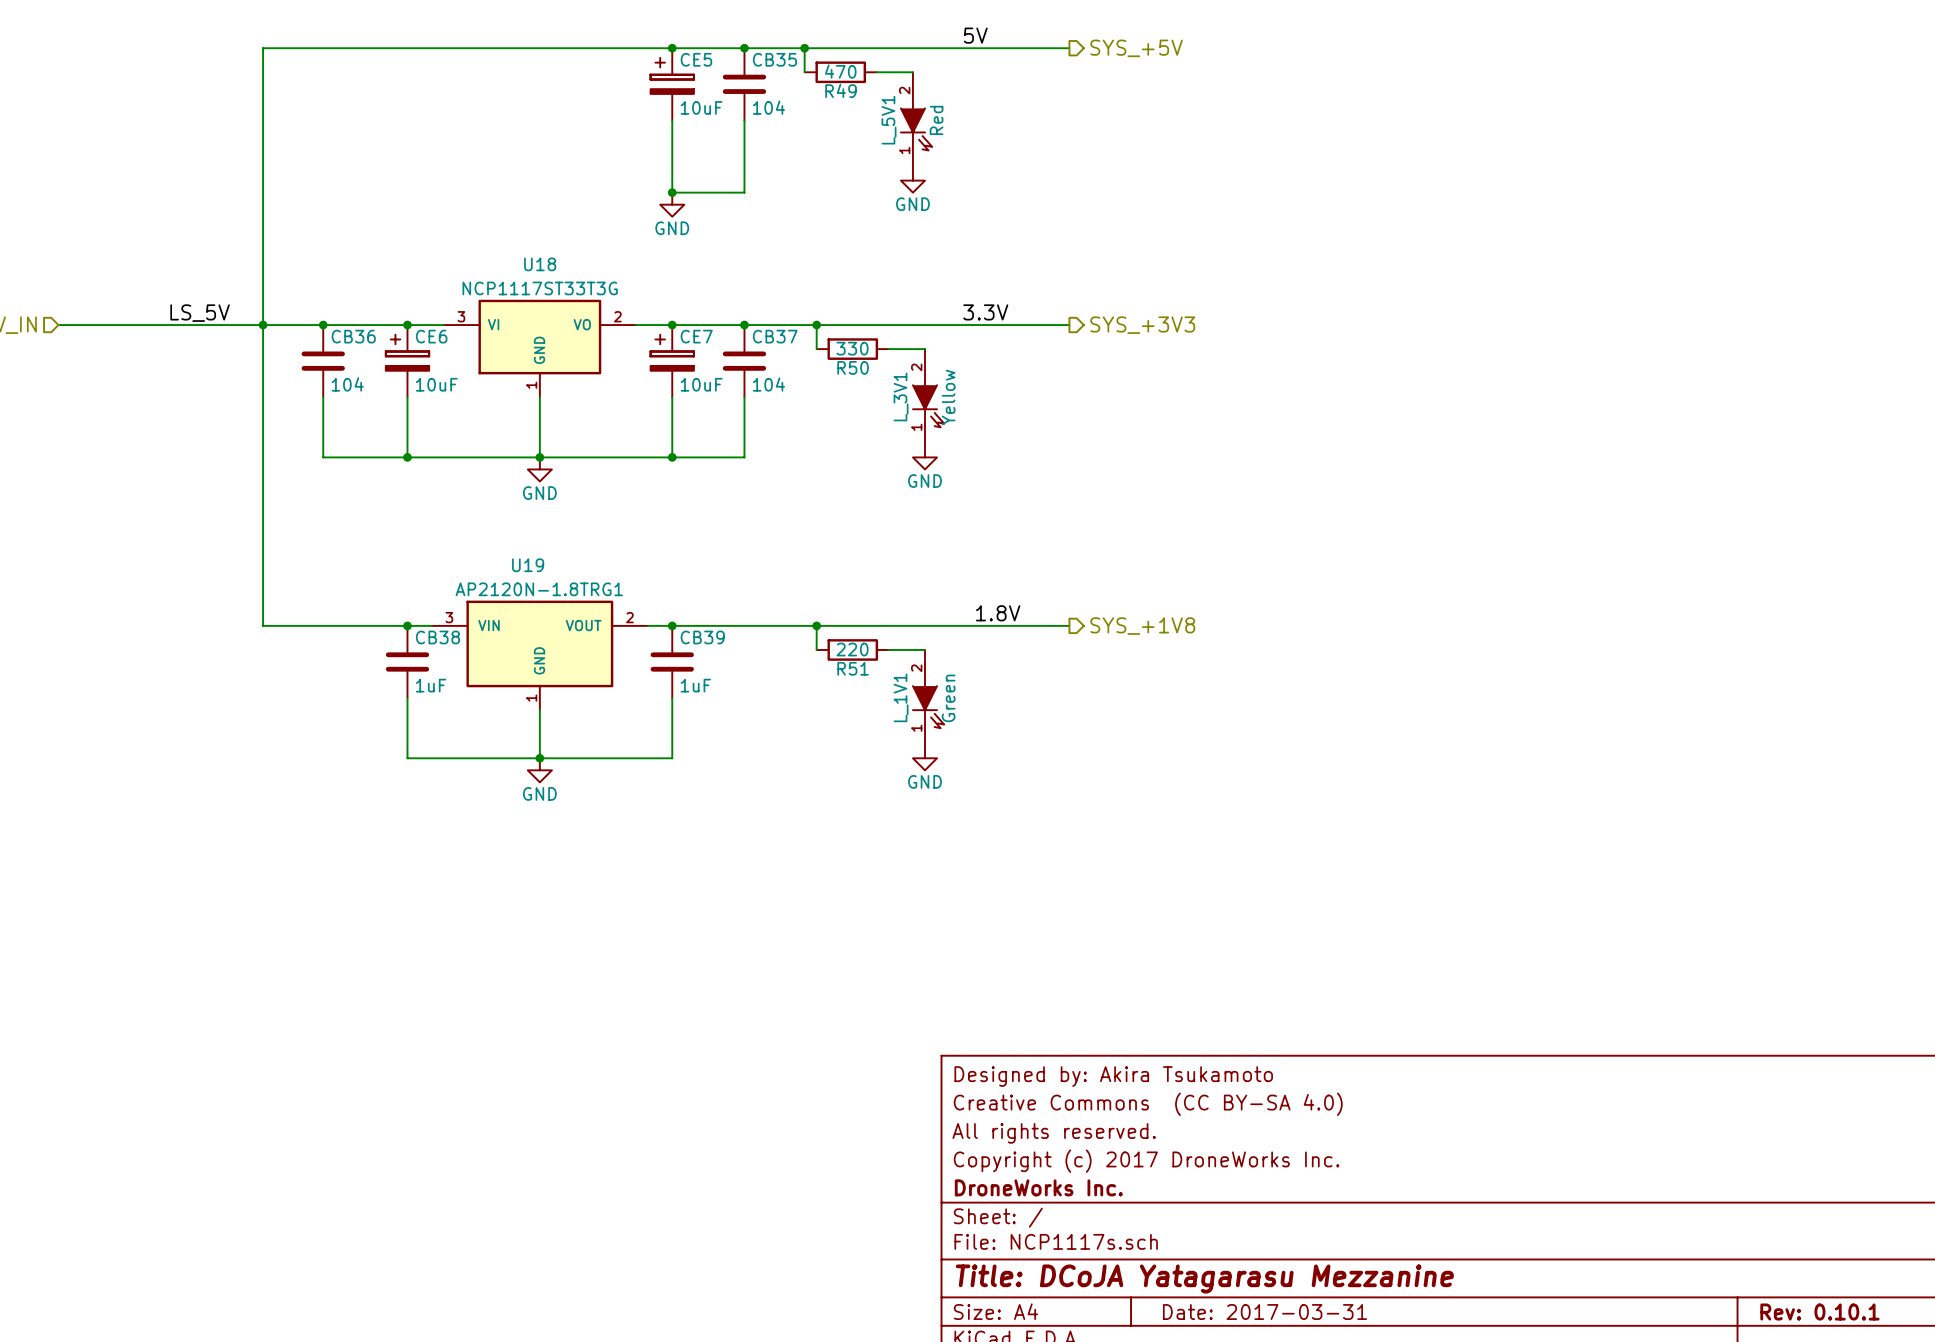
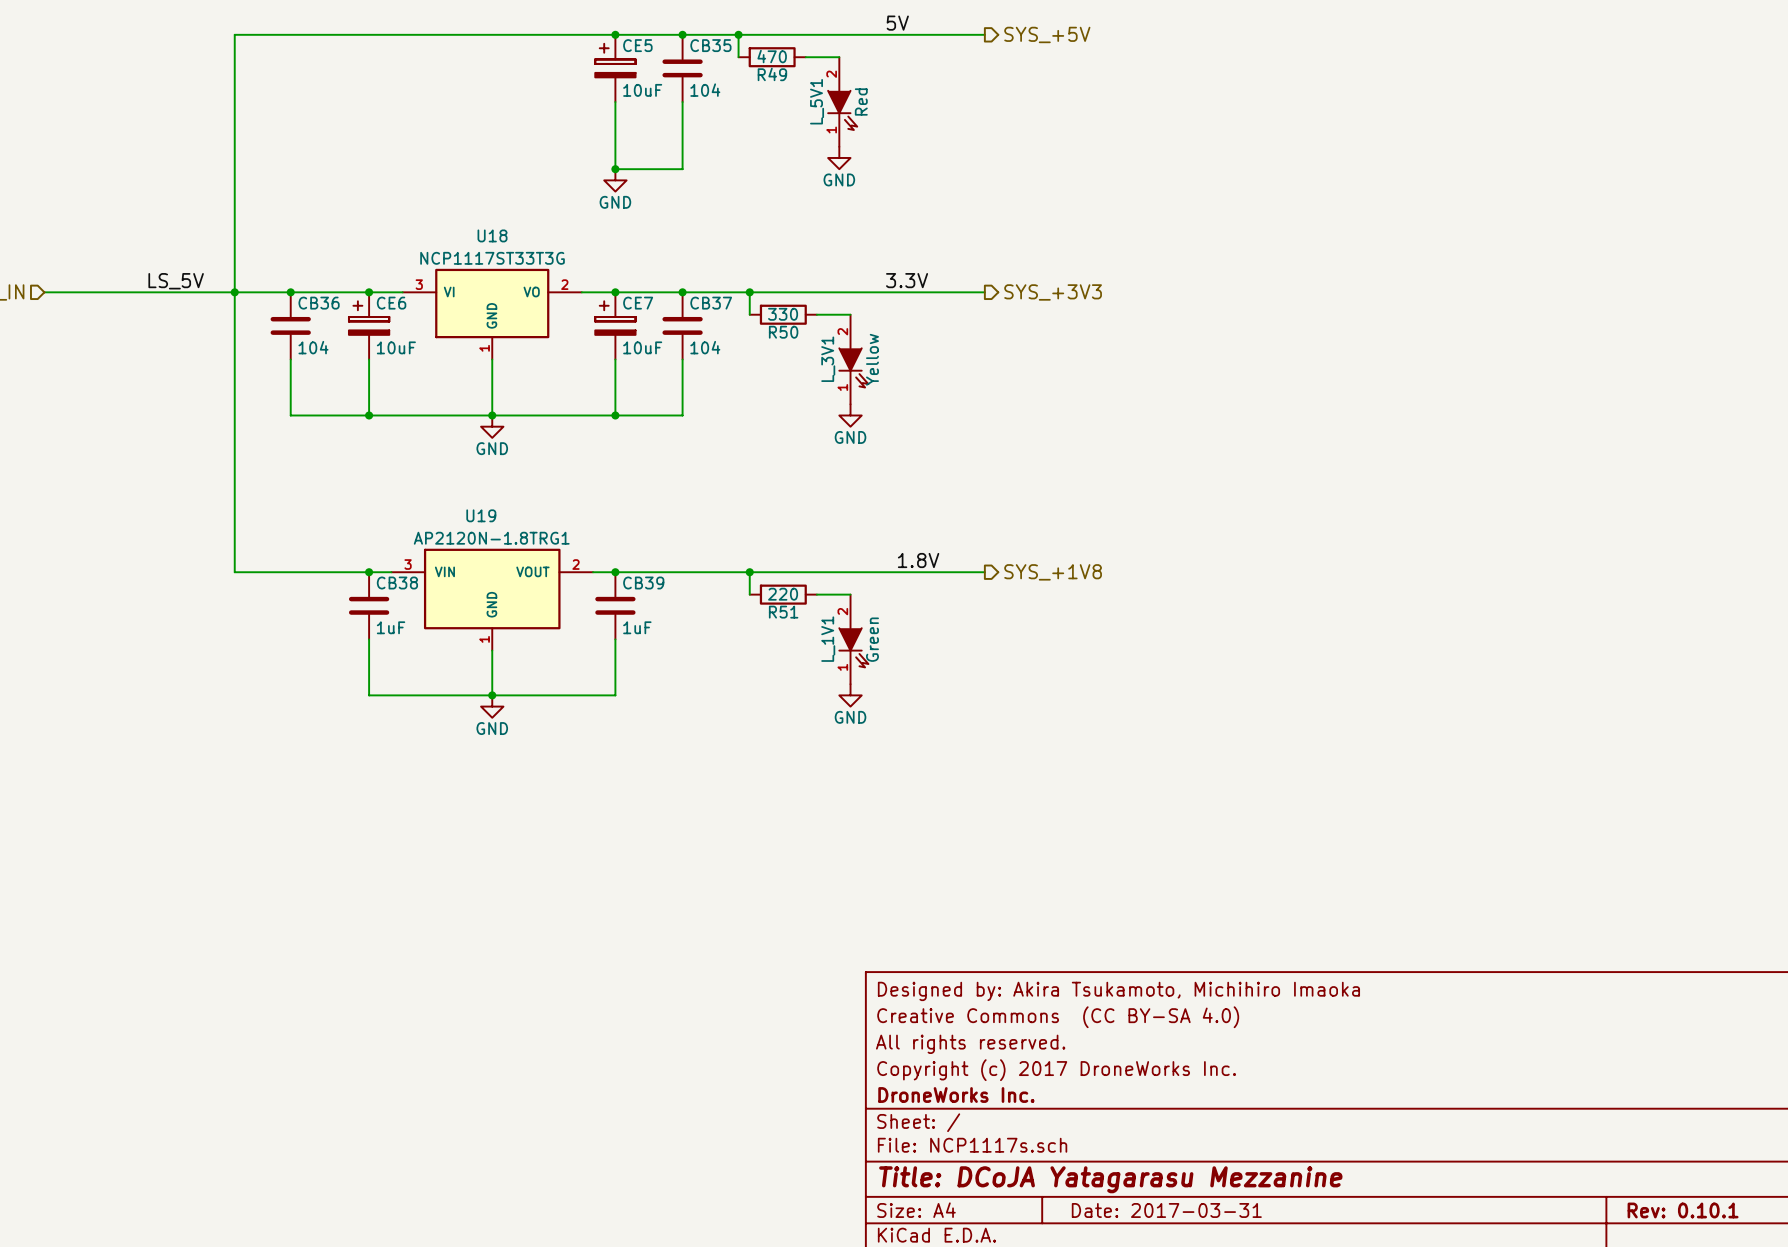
title block: Designed by: Akira Tsukamoto (1113, 1076) -> Designed by: Akira Tsukamoto, Michihiro Imaoka (1118, 991)

